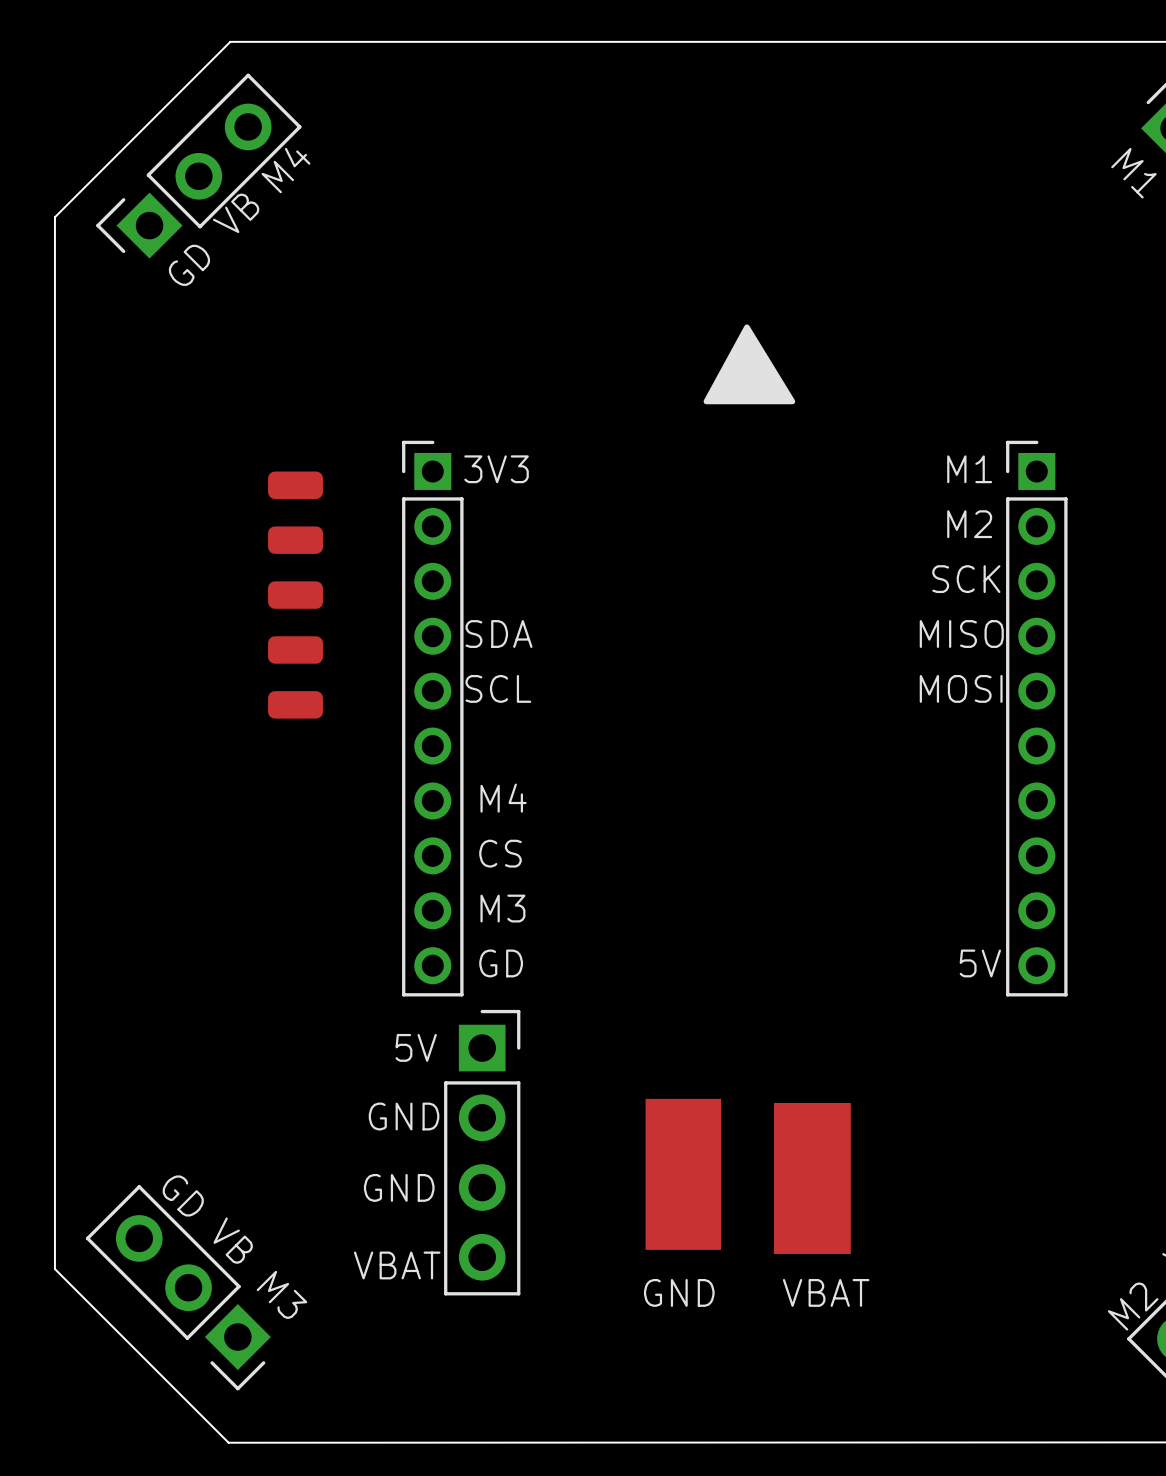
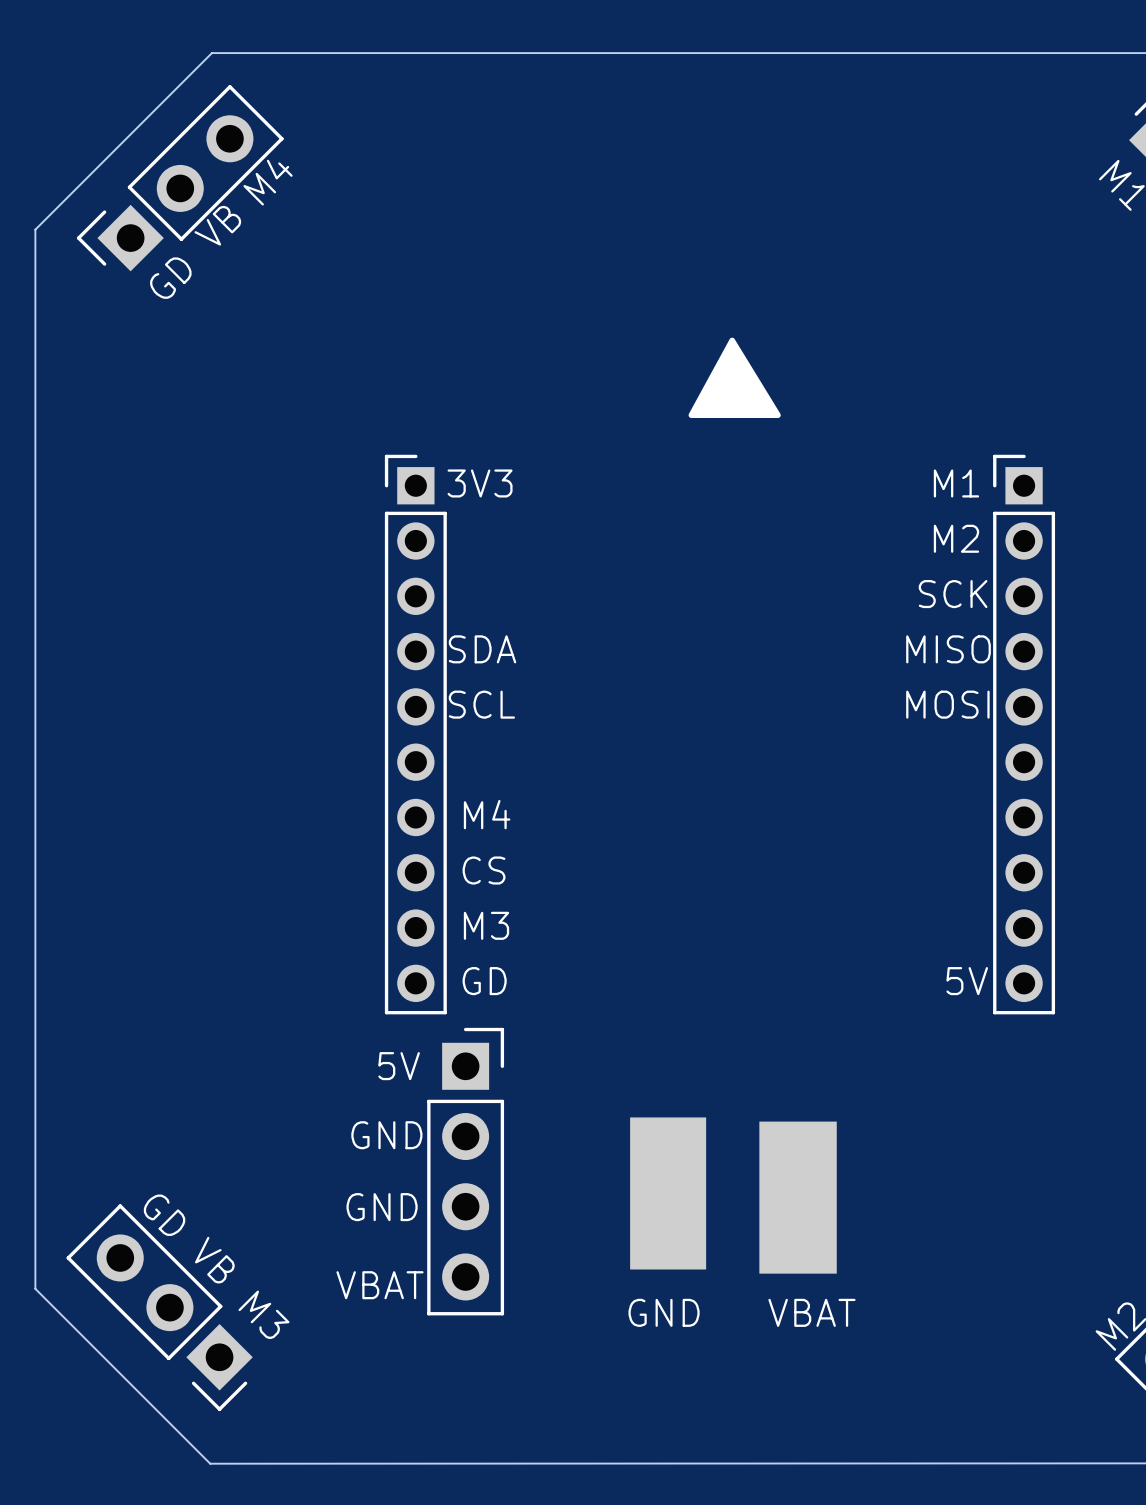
part: (295, 485) -> none
part: (295, 540) -> none
part: (295, 595) -> none
part: (295, 649) -> none
part: (295, 704) -> none

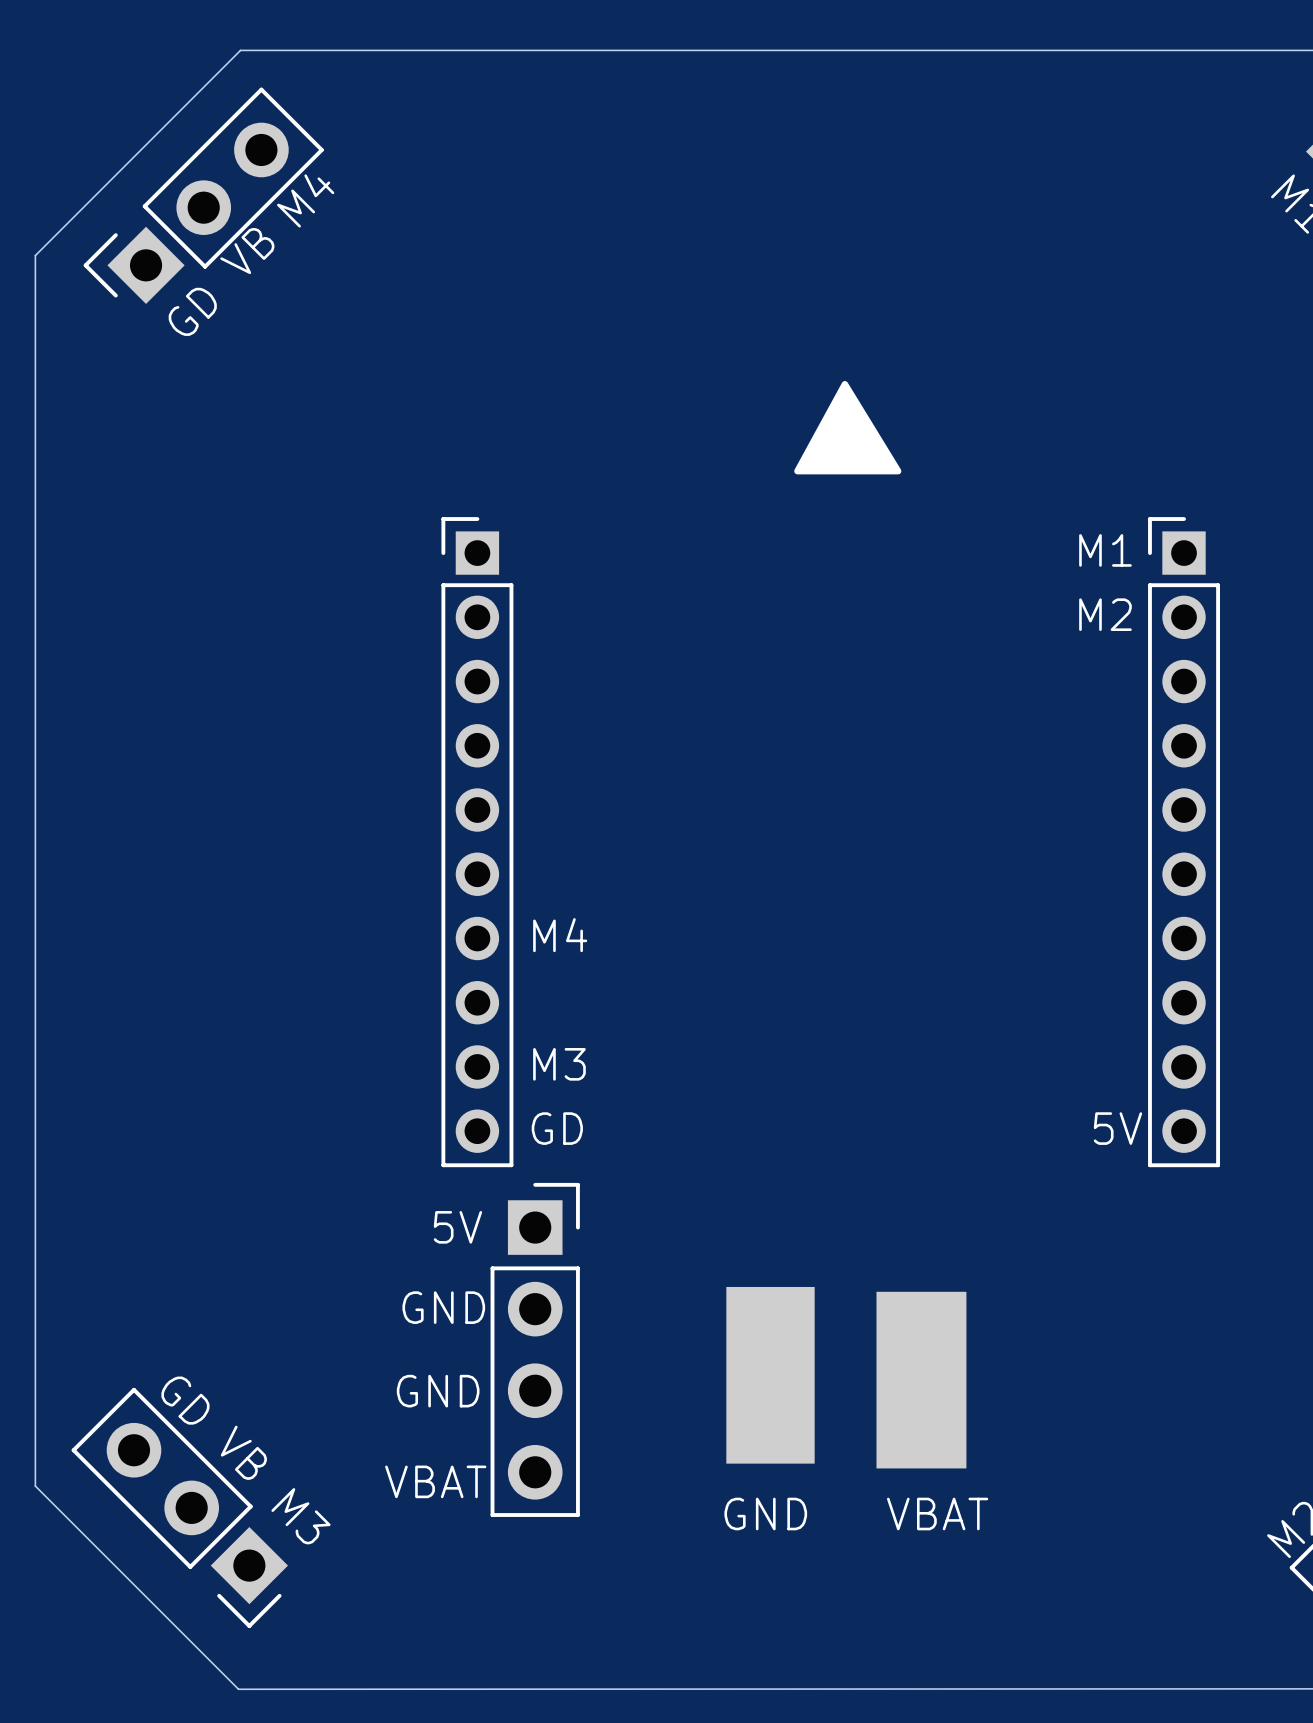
text: 3V3 (480, 483) -> none
text: SCK (953, 594) -> none
text: SDA (482, 649) -> none
text: MISO (948, 649) -> none
text: SCL (481, 704) -> none
text: MOSI (947, 704) -> none
text: CS (484, 870) -> none

